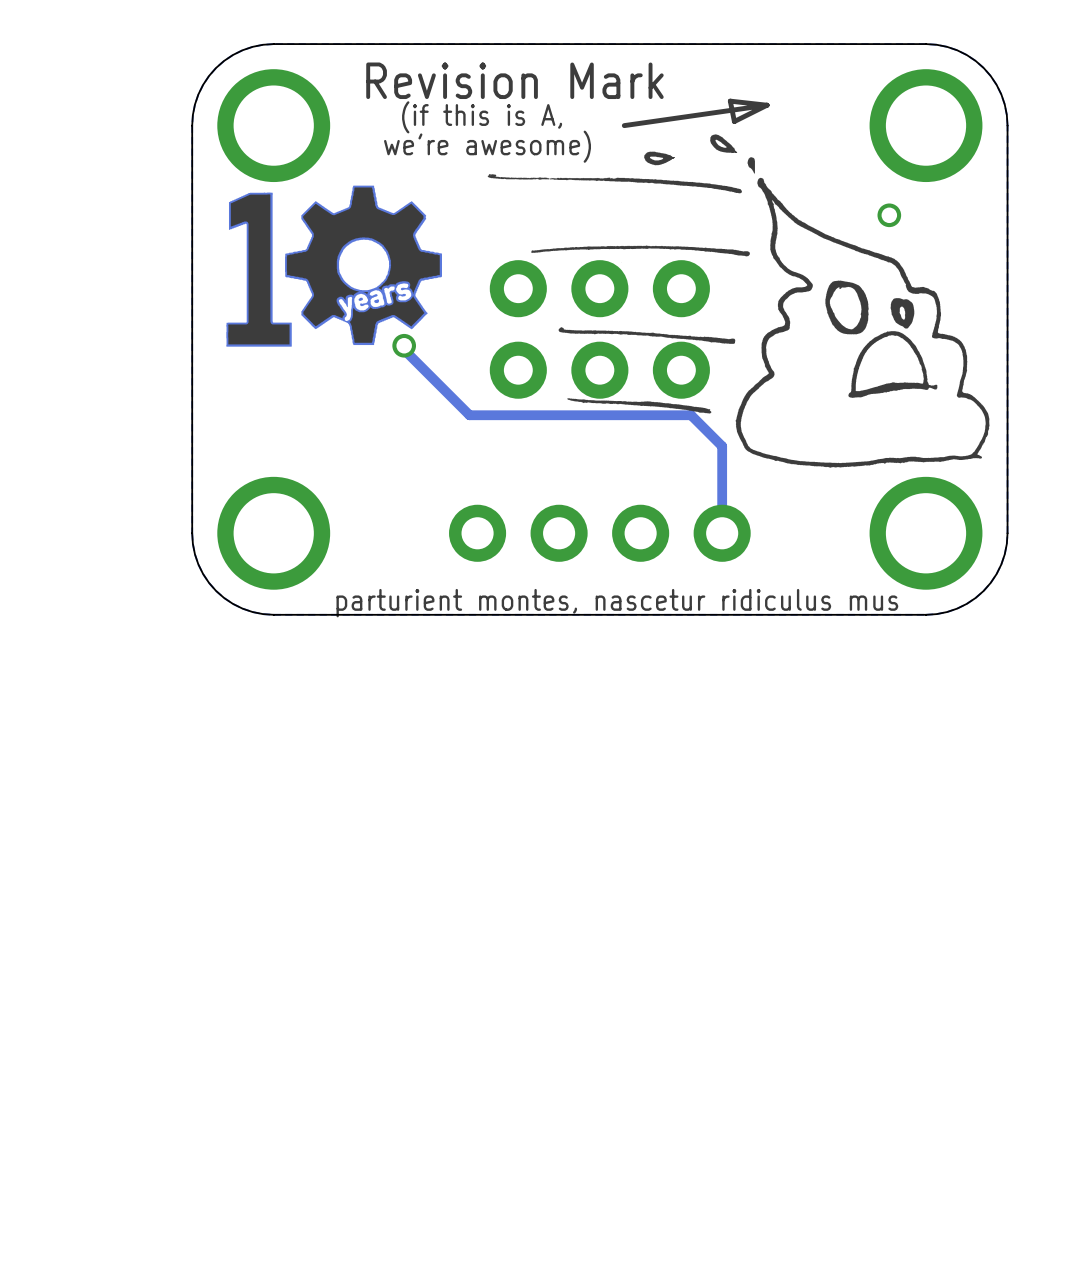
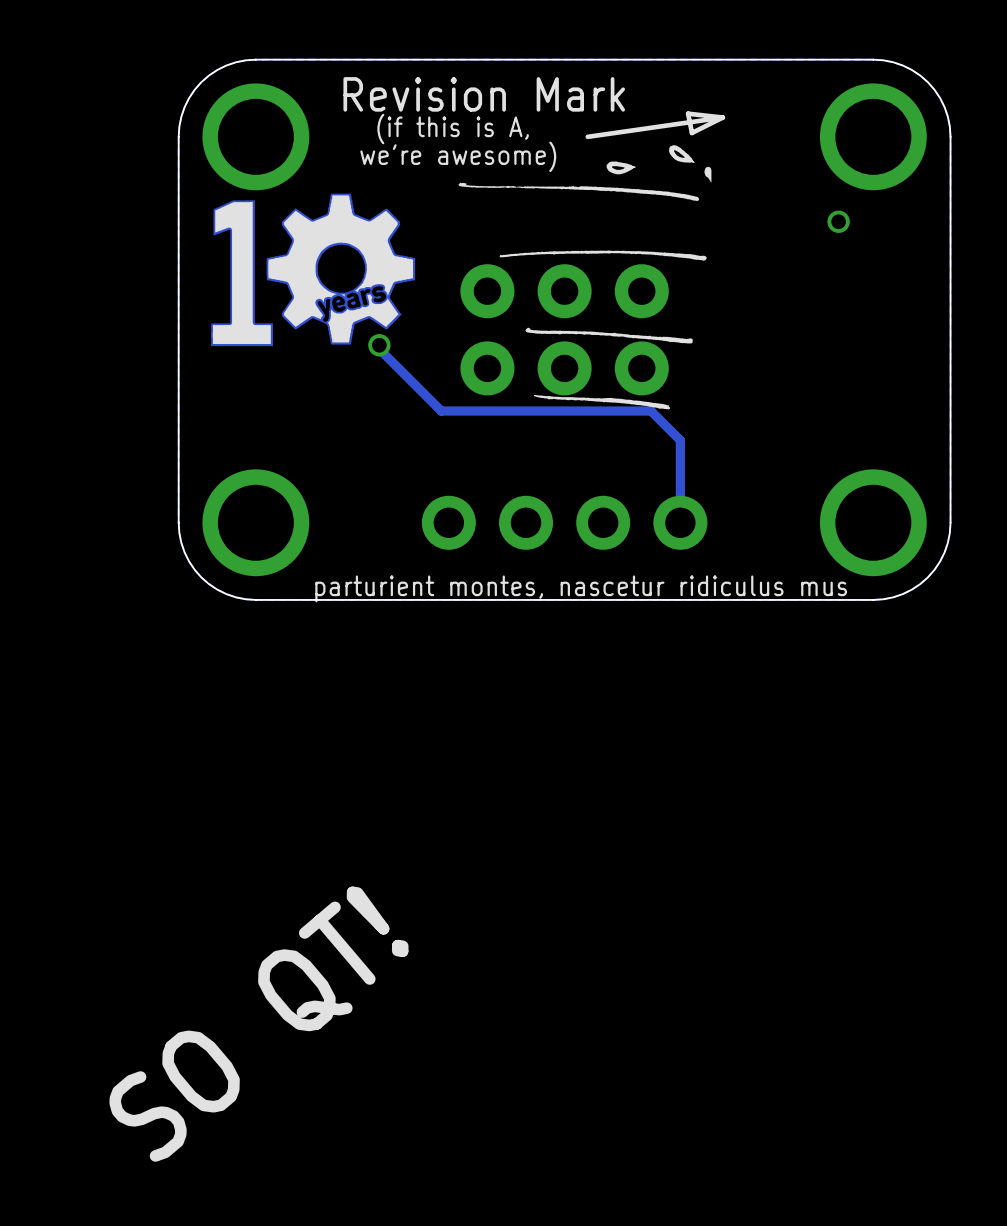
drawing: [735, 177, 990, 468] -> none
text: none -> SO QT! (259, 1024)

